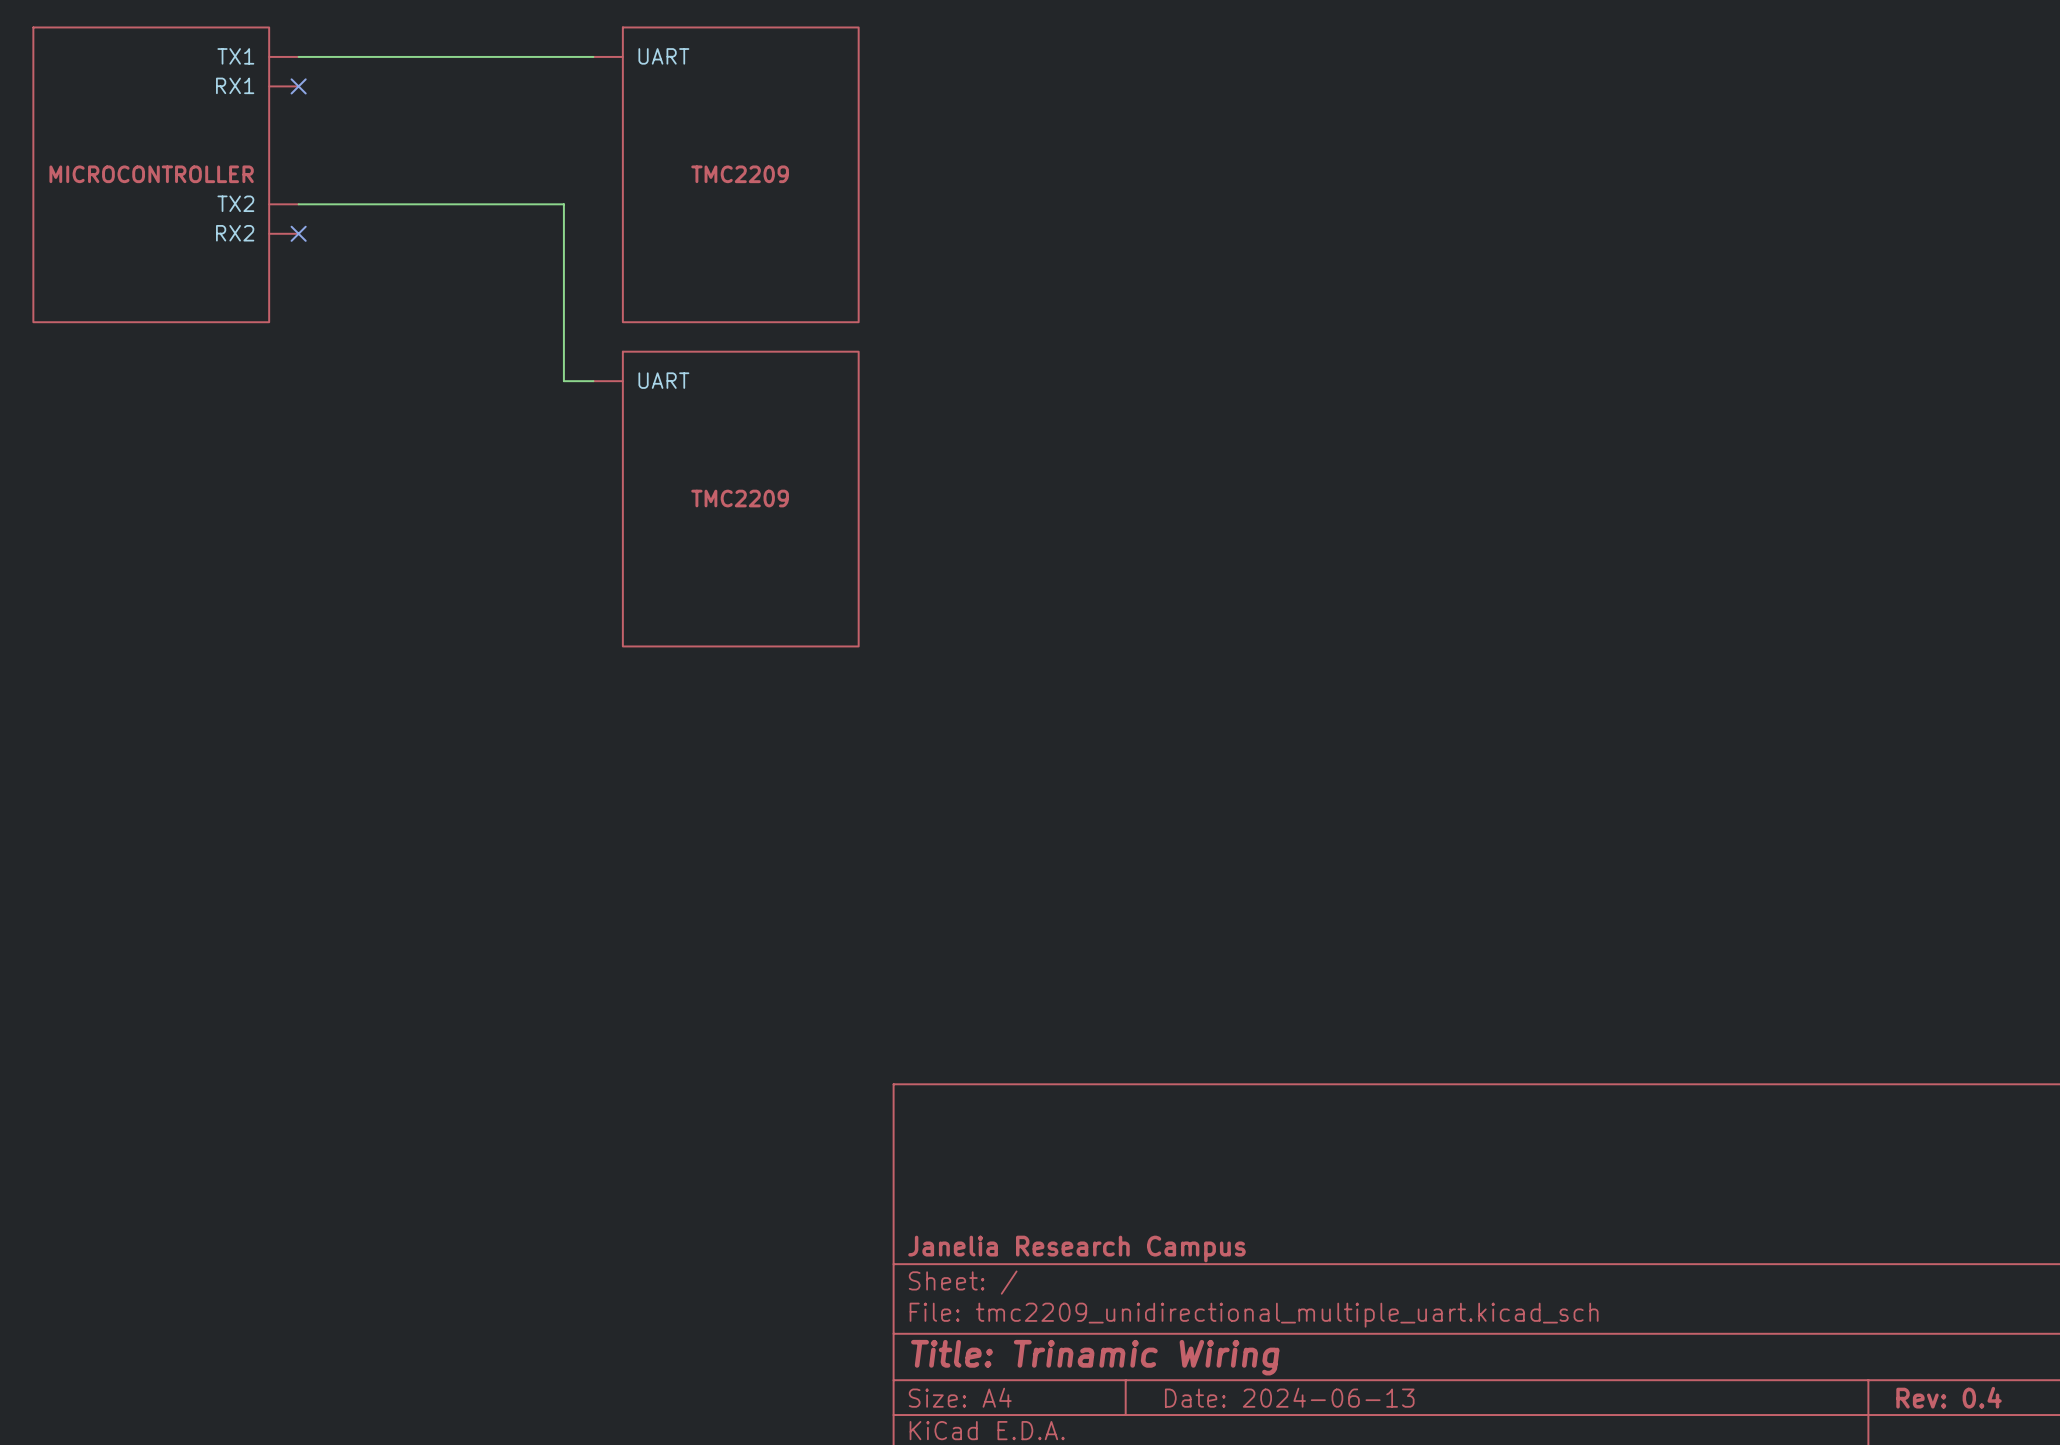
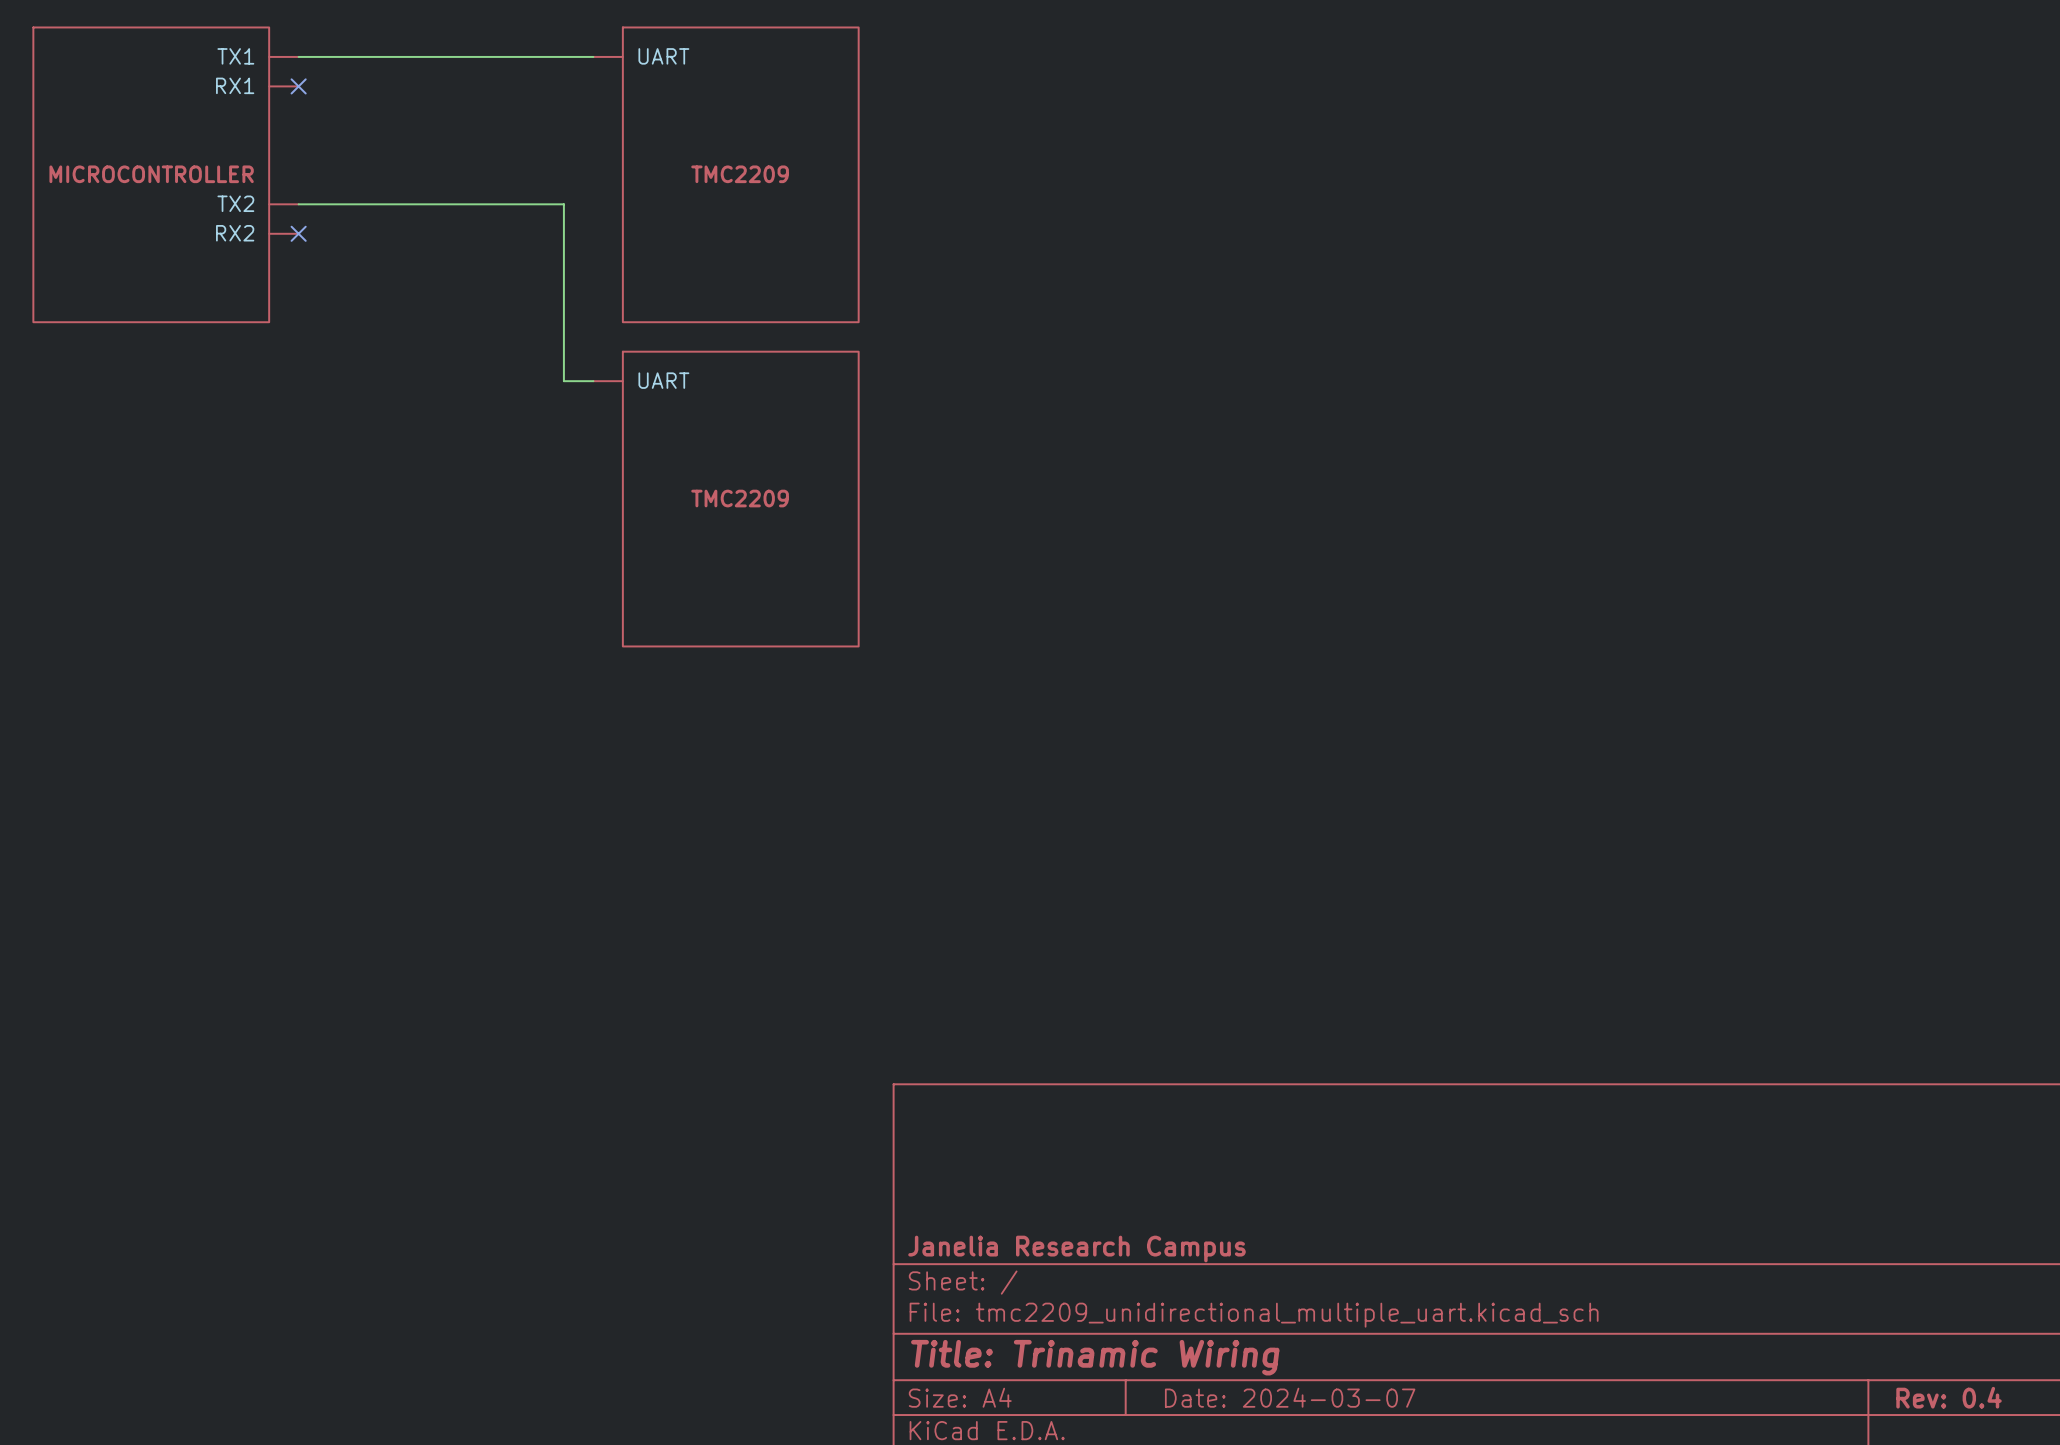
title block: Date: 2024-06-13 (1289, 1397) -> Date: 2024-03-07 (1290, 1397)

